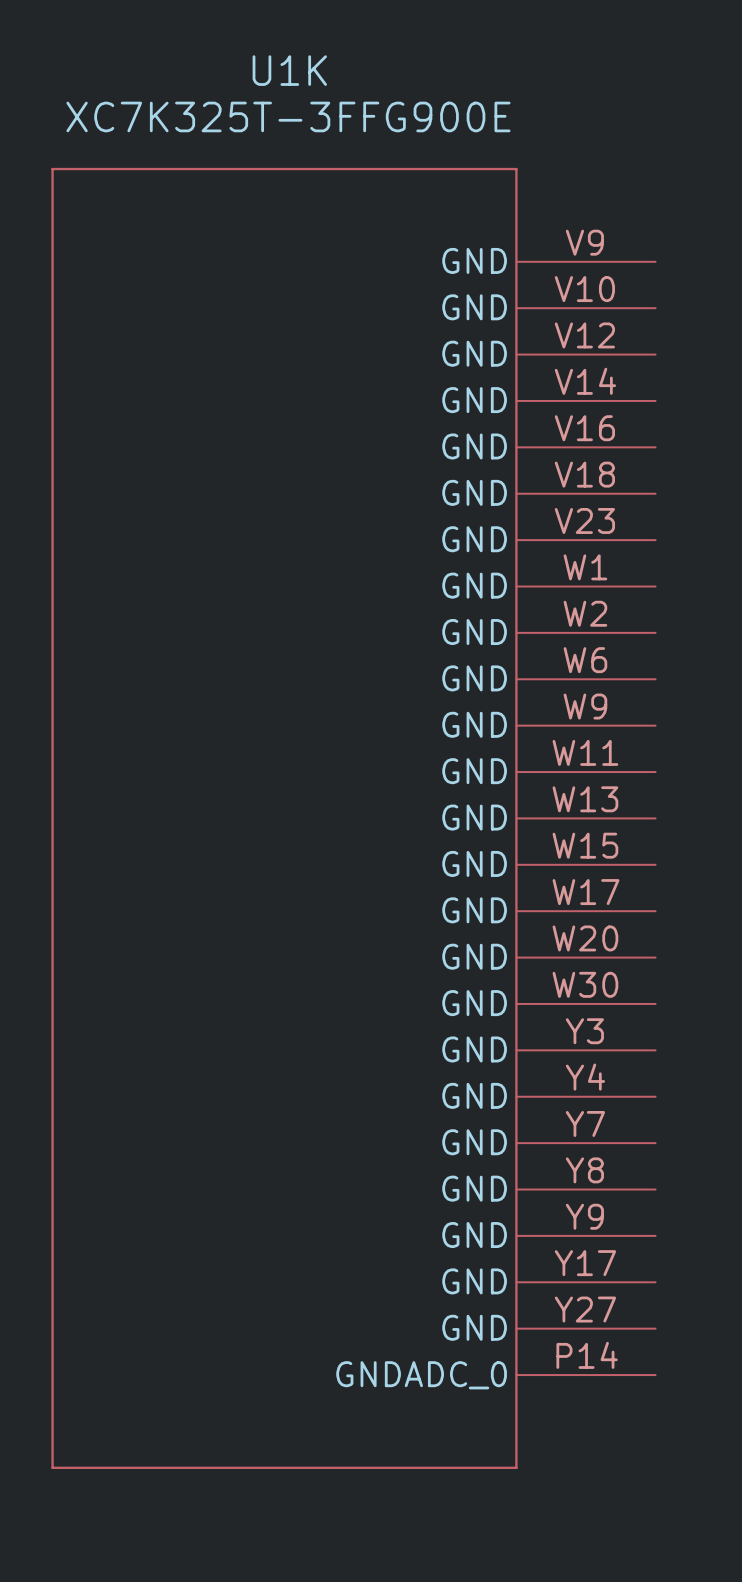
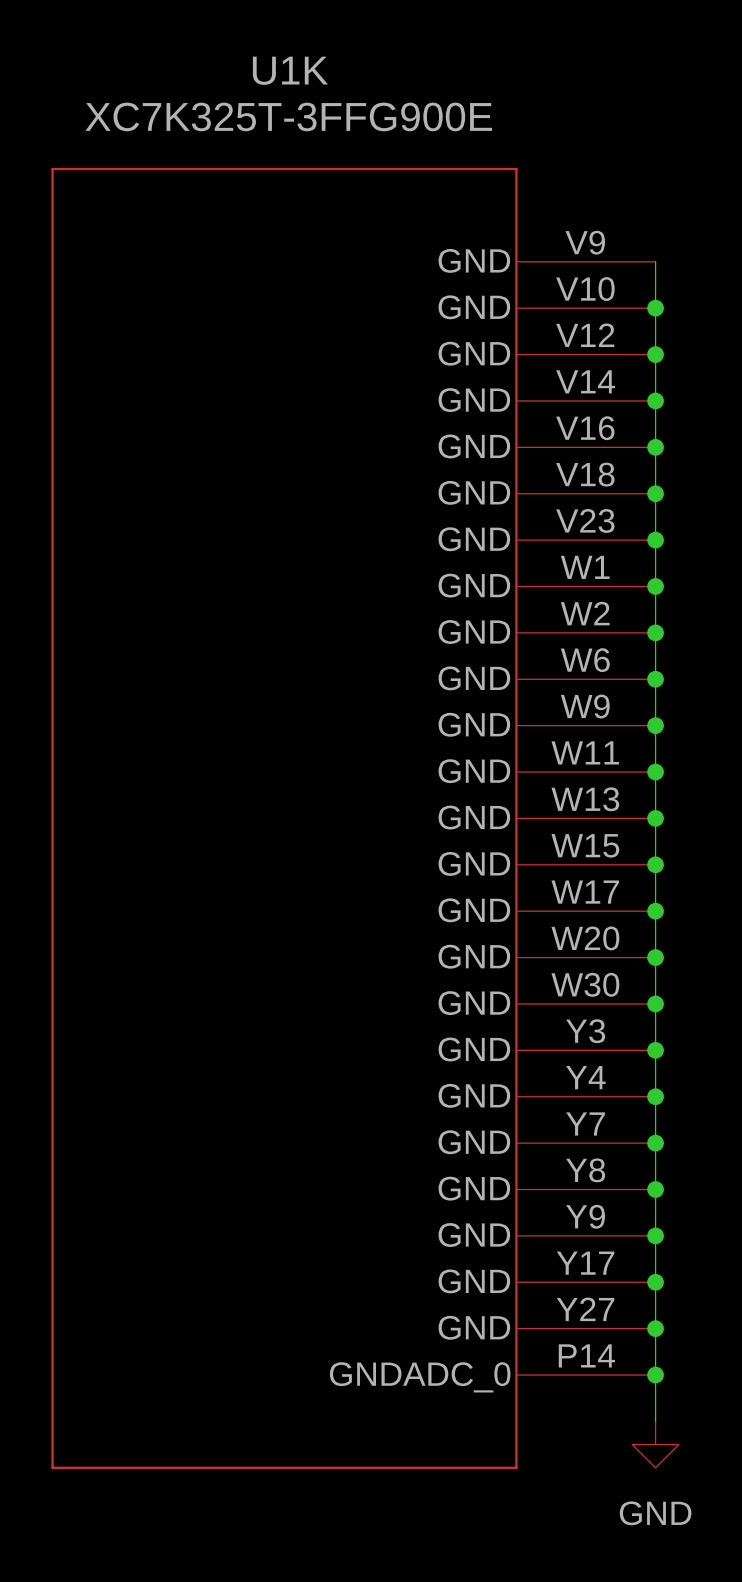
wire: none -> (655, 261) (655, 1421)
junction: none -> (655, 308)
junction: none -> (655, 354)
junction: none -> (655, 400)
junction: none -> (655, 447)
junction: none -> (655, 493)
junction: none -> (655, 540)
junction: none -> (655, 586)
junction: none -> (655, 632)
junction: none -> (655, 679)
junction: none -> (655, 725)
junction: none -> (655, 772)
junction: none -> (655, 818)
junction: none -> (655, 864)
junction: none -> (655, 911)
junction: none -> (655, 957)
junction: none -> (655, 1003)
junction: none -> (655, 1050)
junction: none -> (655, 1096)
junction: none -> (655, 1143)
junction: none -> (655, 1189)
junction: none -> (655, 1235)
junction: none -> (655, 1282)
junction: none -> (655, 1328)
junction: none -> (655, 1375)
power symbol: none -> GND (655, 1444)

